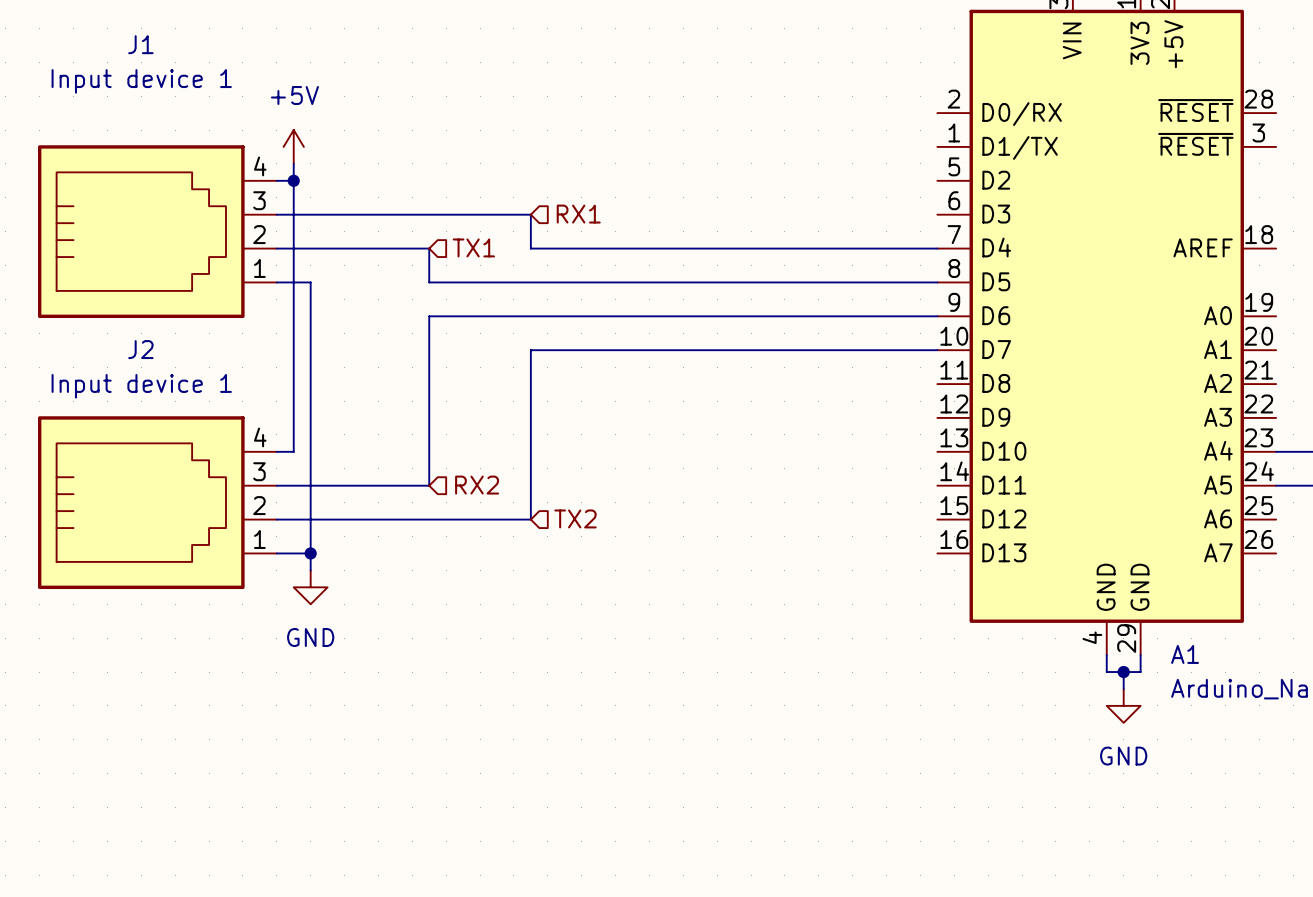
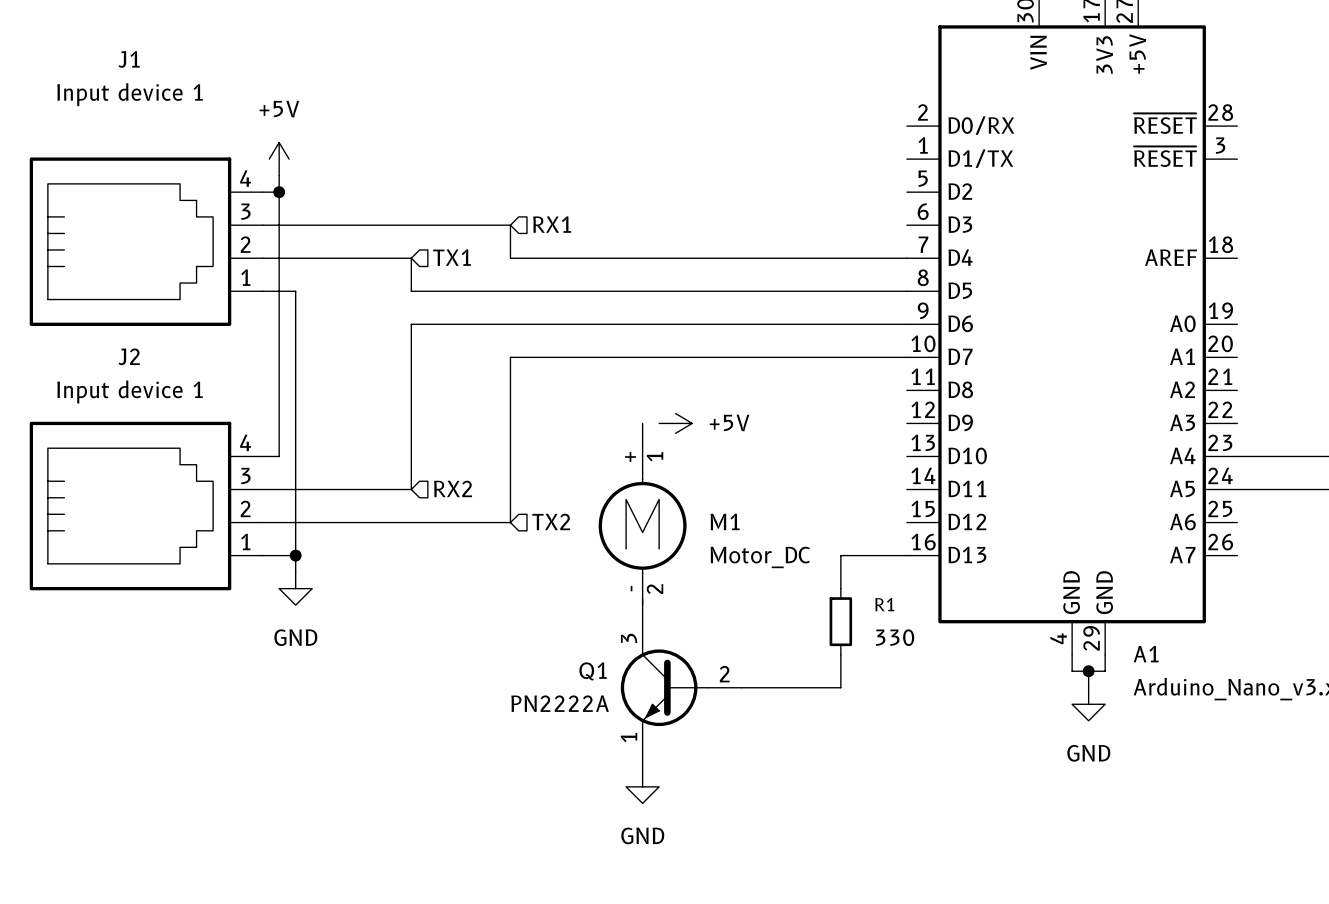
wire: none -> (642, 423) (642, 439)
power symbol: none -> +5V (675, 423)
M1: none -> Motor_DC (642, 522)
wire: none -> (906, 555) (840, 555) (840, 588)
wire: none -> (642, 605) (642, 621)
R1: none -> 330 (840, 621)
wire: none -> (840, 654) (840, 687) (741, 687)
Q1: none -> PN2222A (681, 687)
wire: none -> (642, 753) (642, 770)
power symbol: none -> GND (642, 786)

